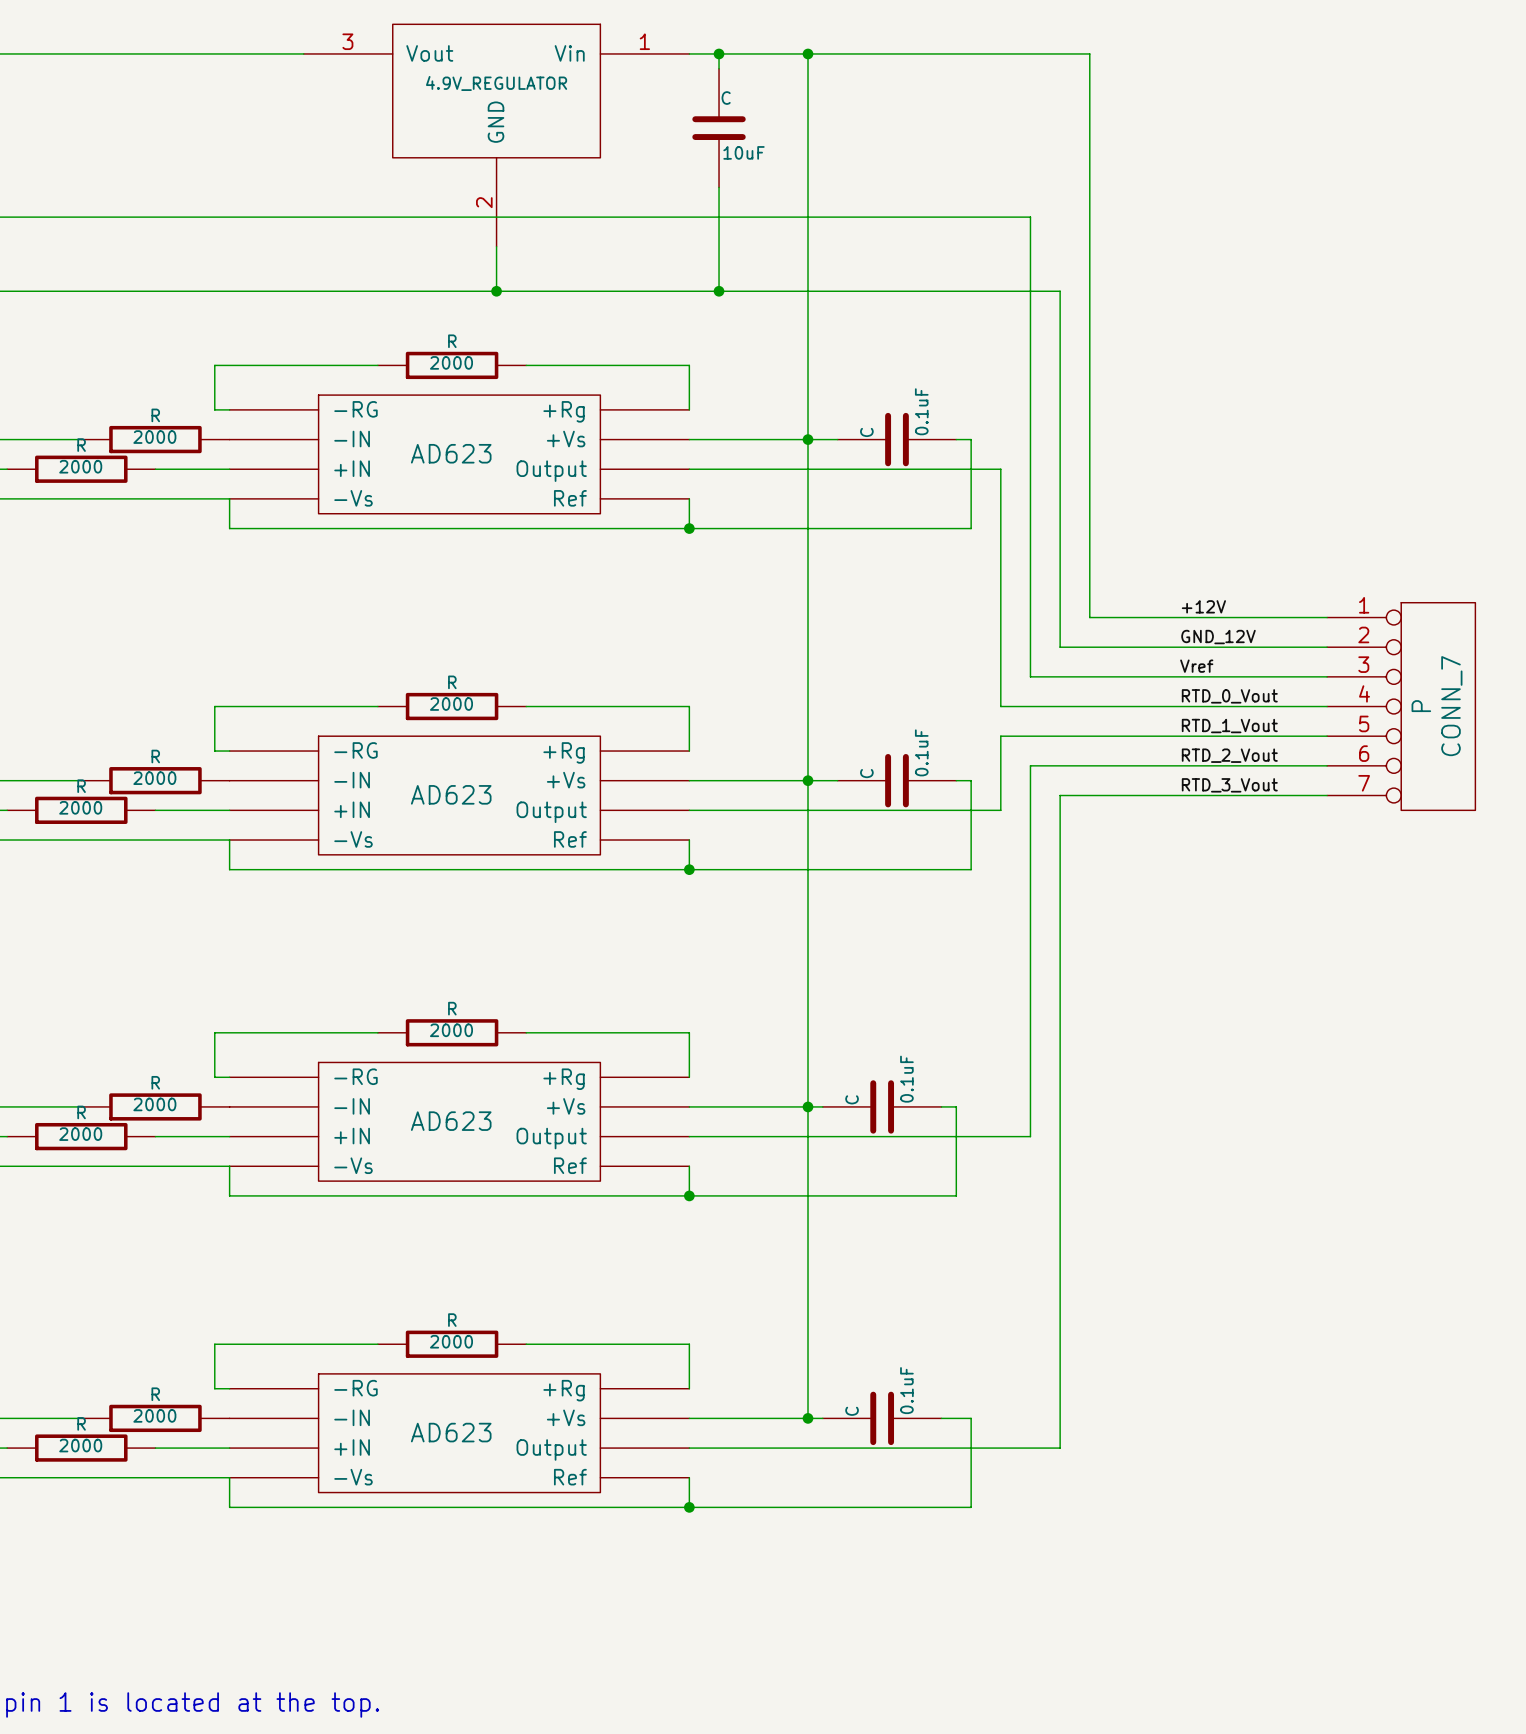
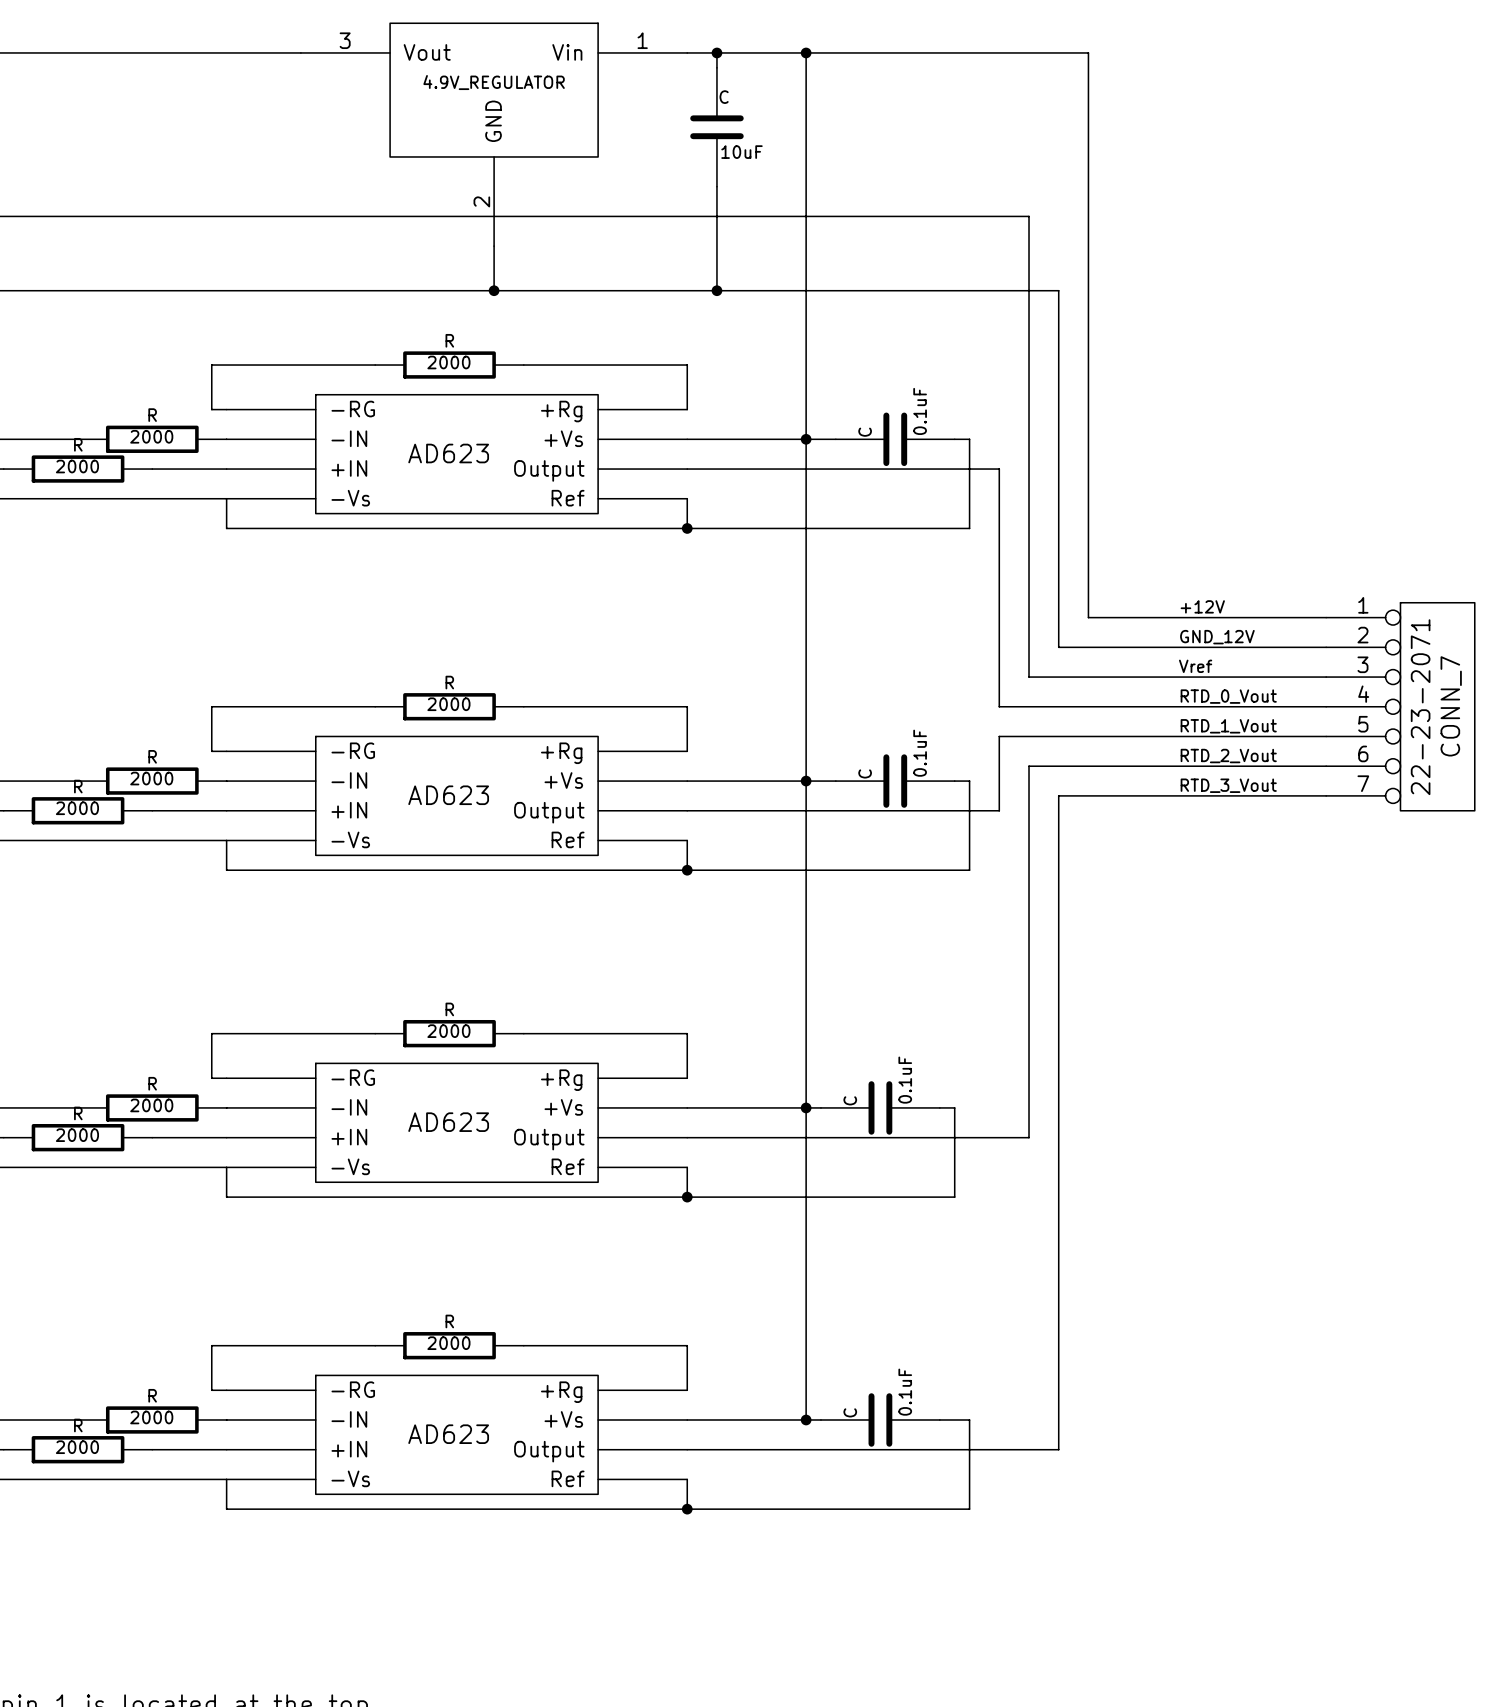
P name: P (1421, 706) -> 22-23-2071 (1420, 707)

